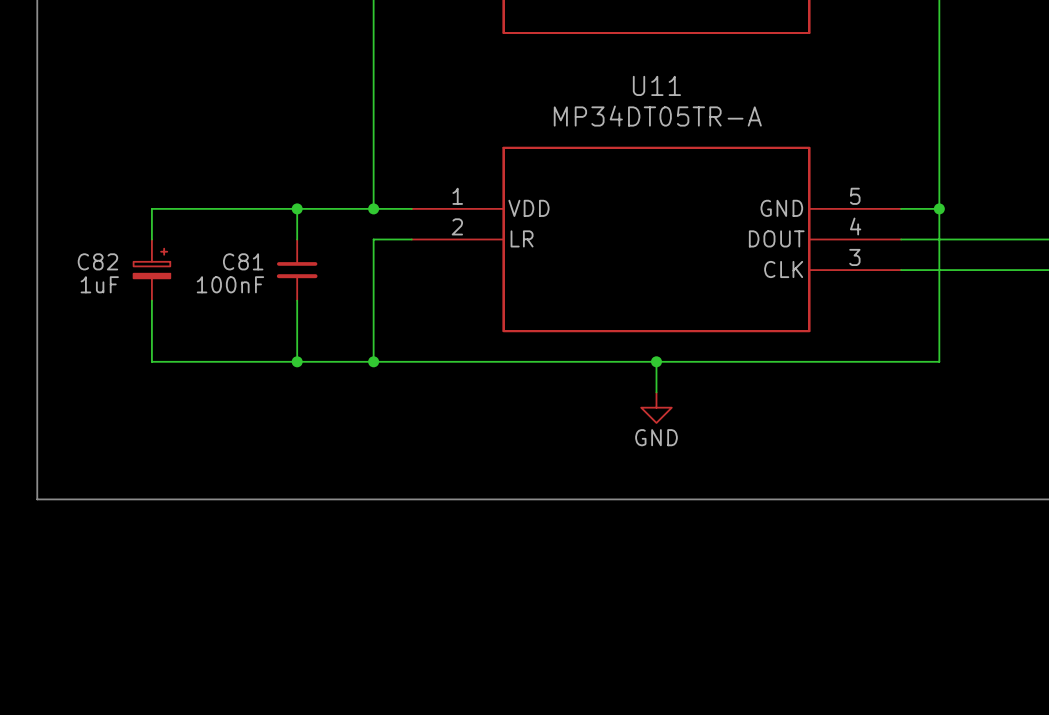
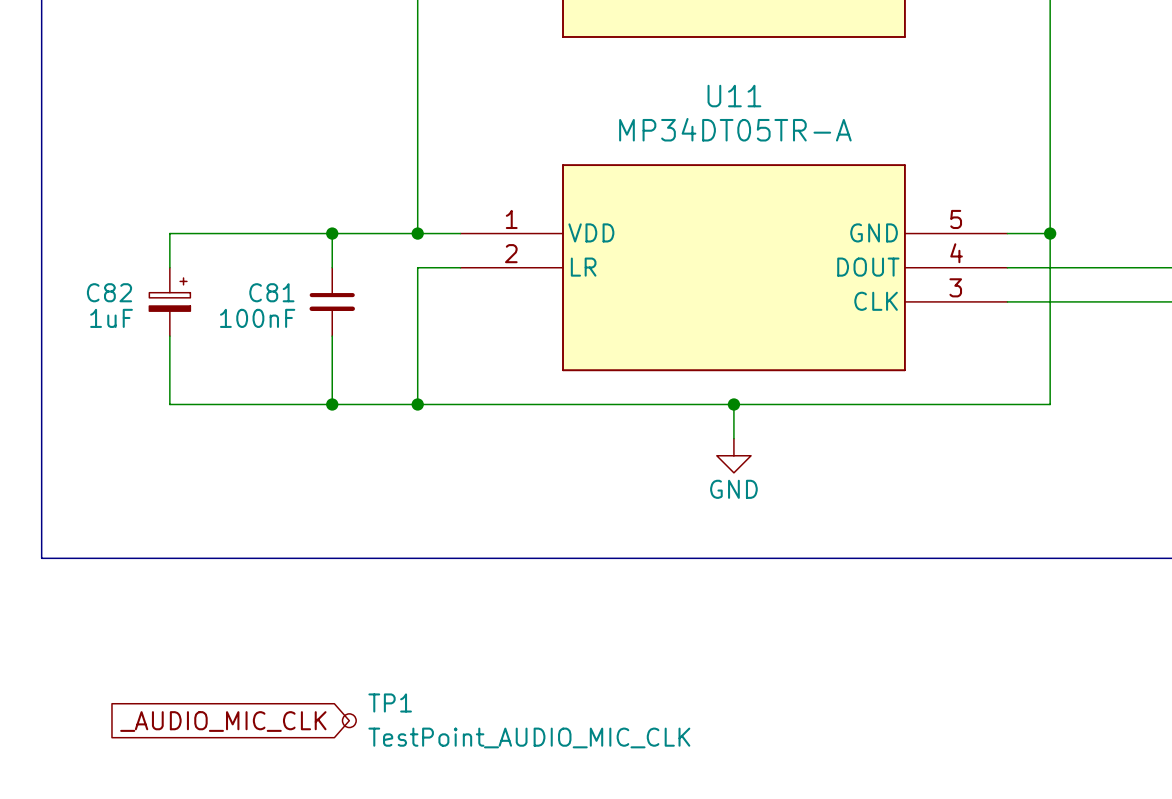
TP1: none -> TestPoint_AUDIO_MIC_CLK (349, 720)
global label: none -> _AUDIO_MIC_CLK (223, 721)

